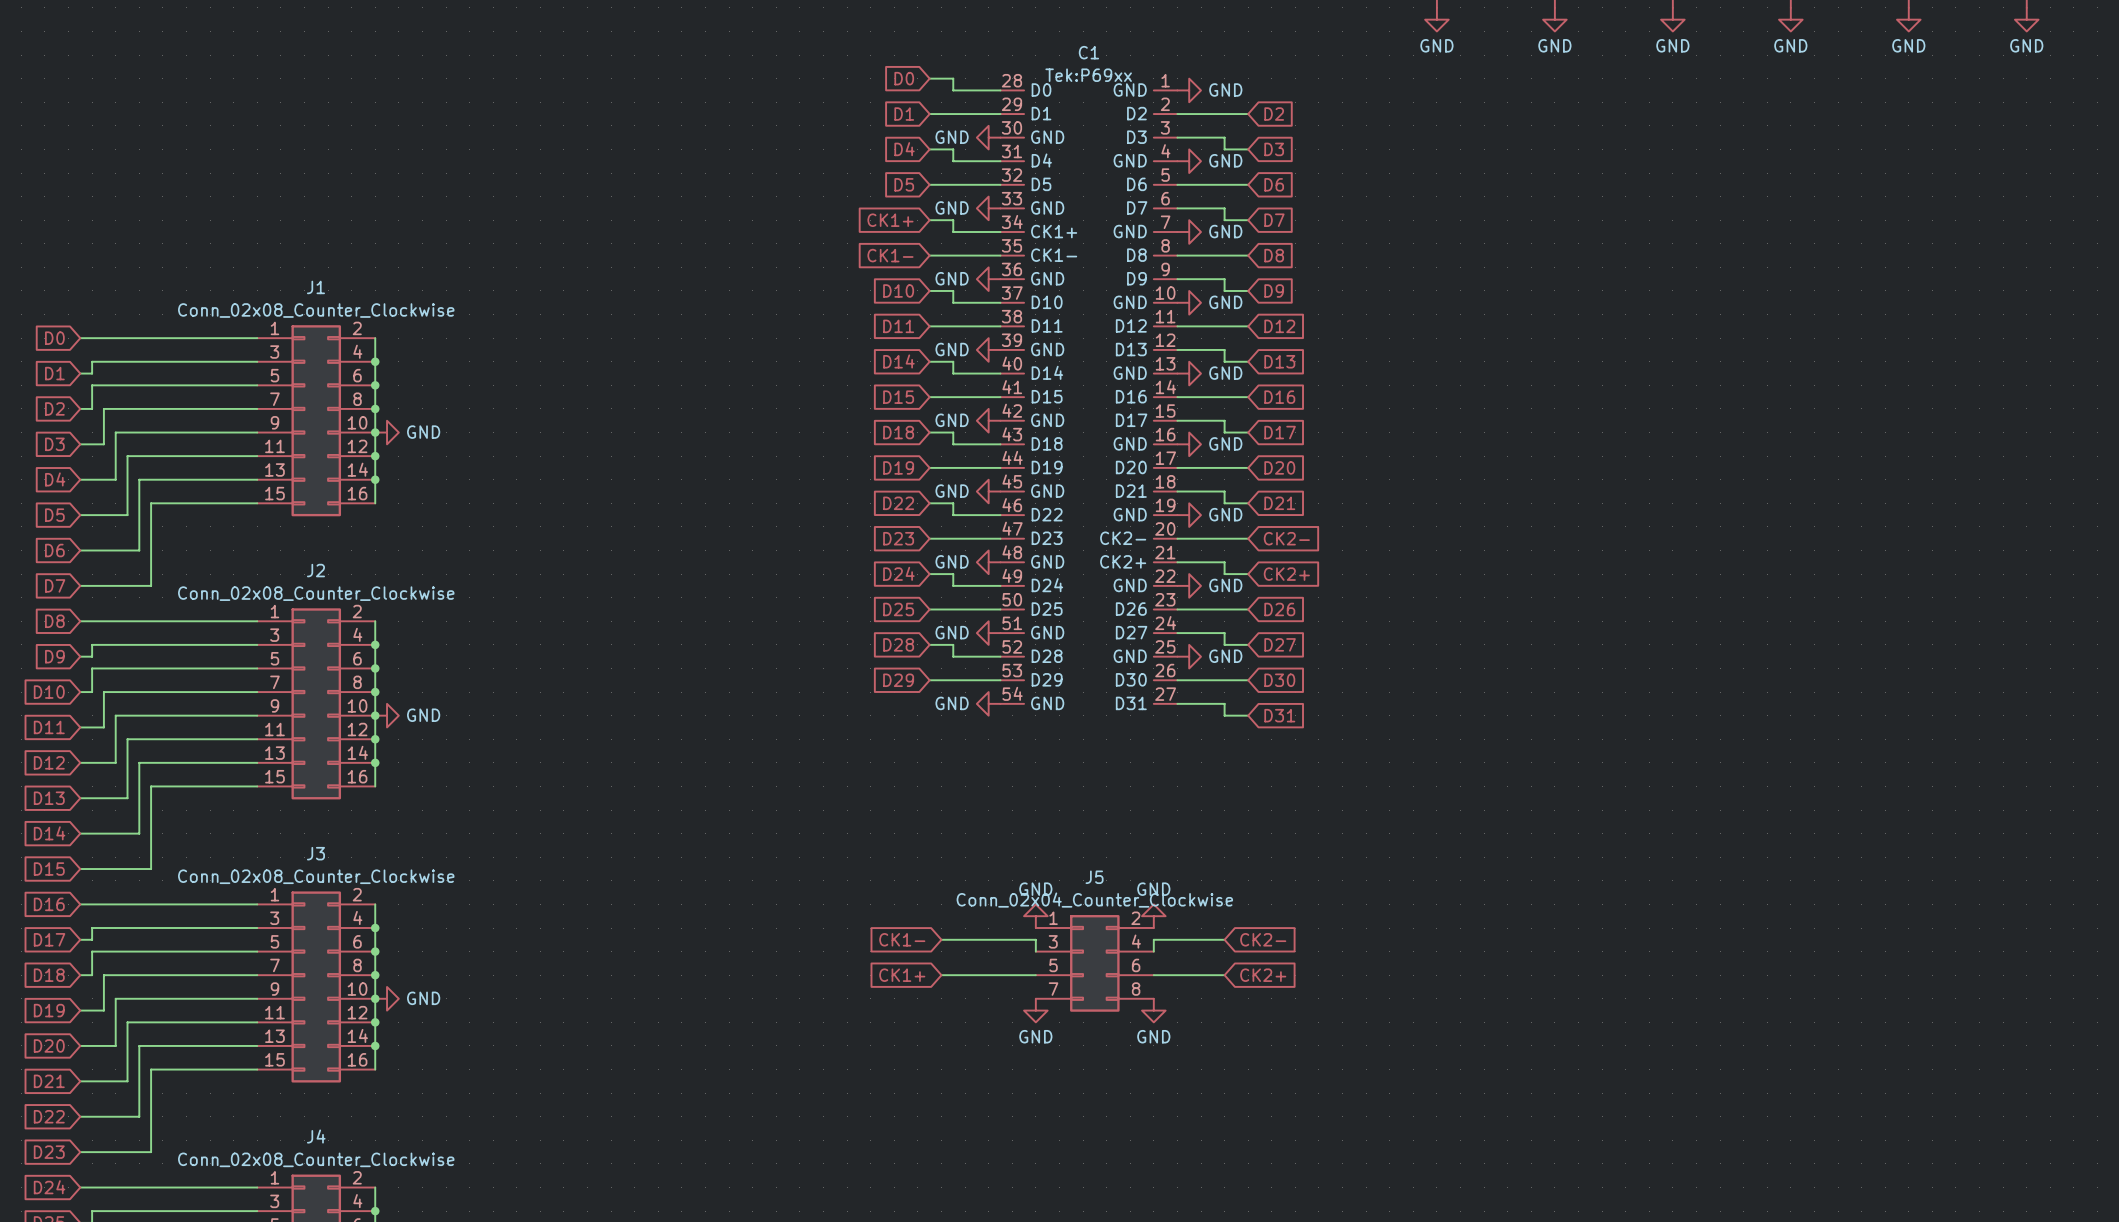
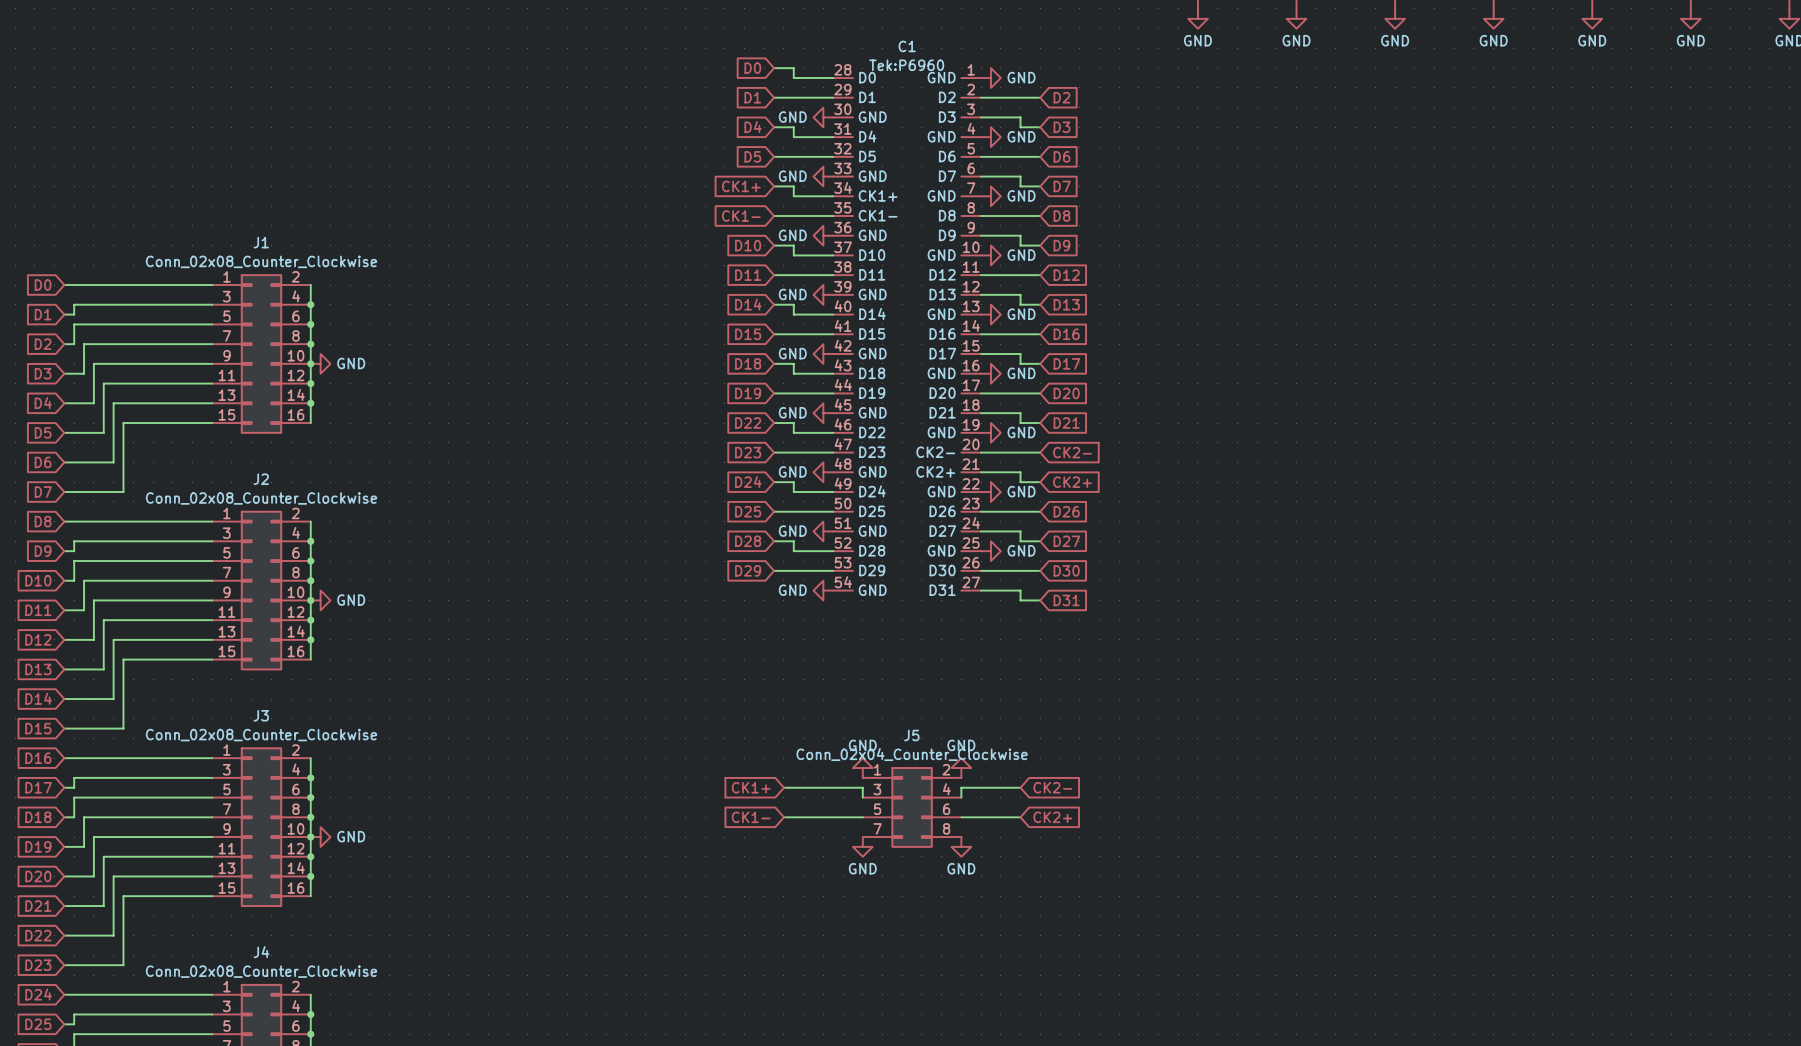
C1 text: Tek:P69xx (1088, 75) -> Tek:P6960 (906, 65)
global label: CK1- (902, 939) -> CK1+ (751, 787)
global label: CK1+ (902, 975) -> CK1- (751, 817)

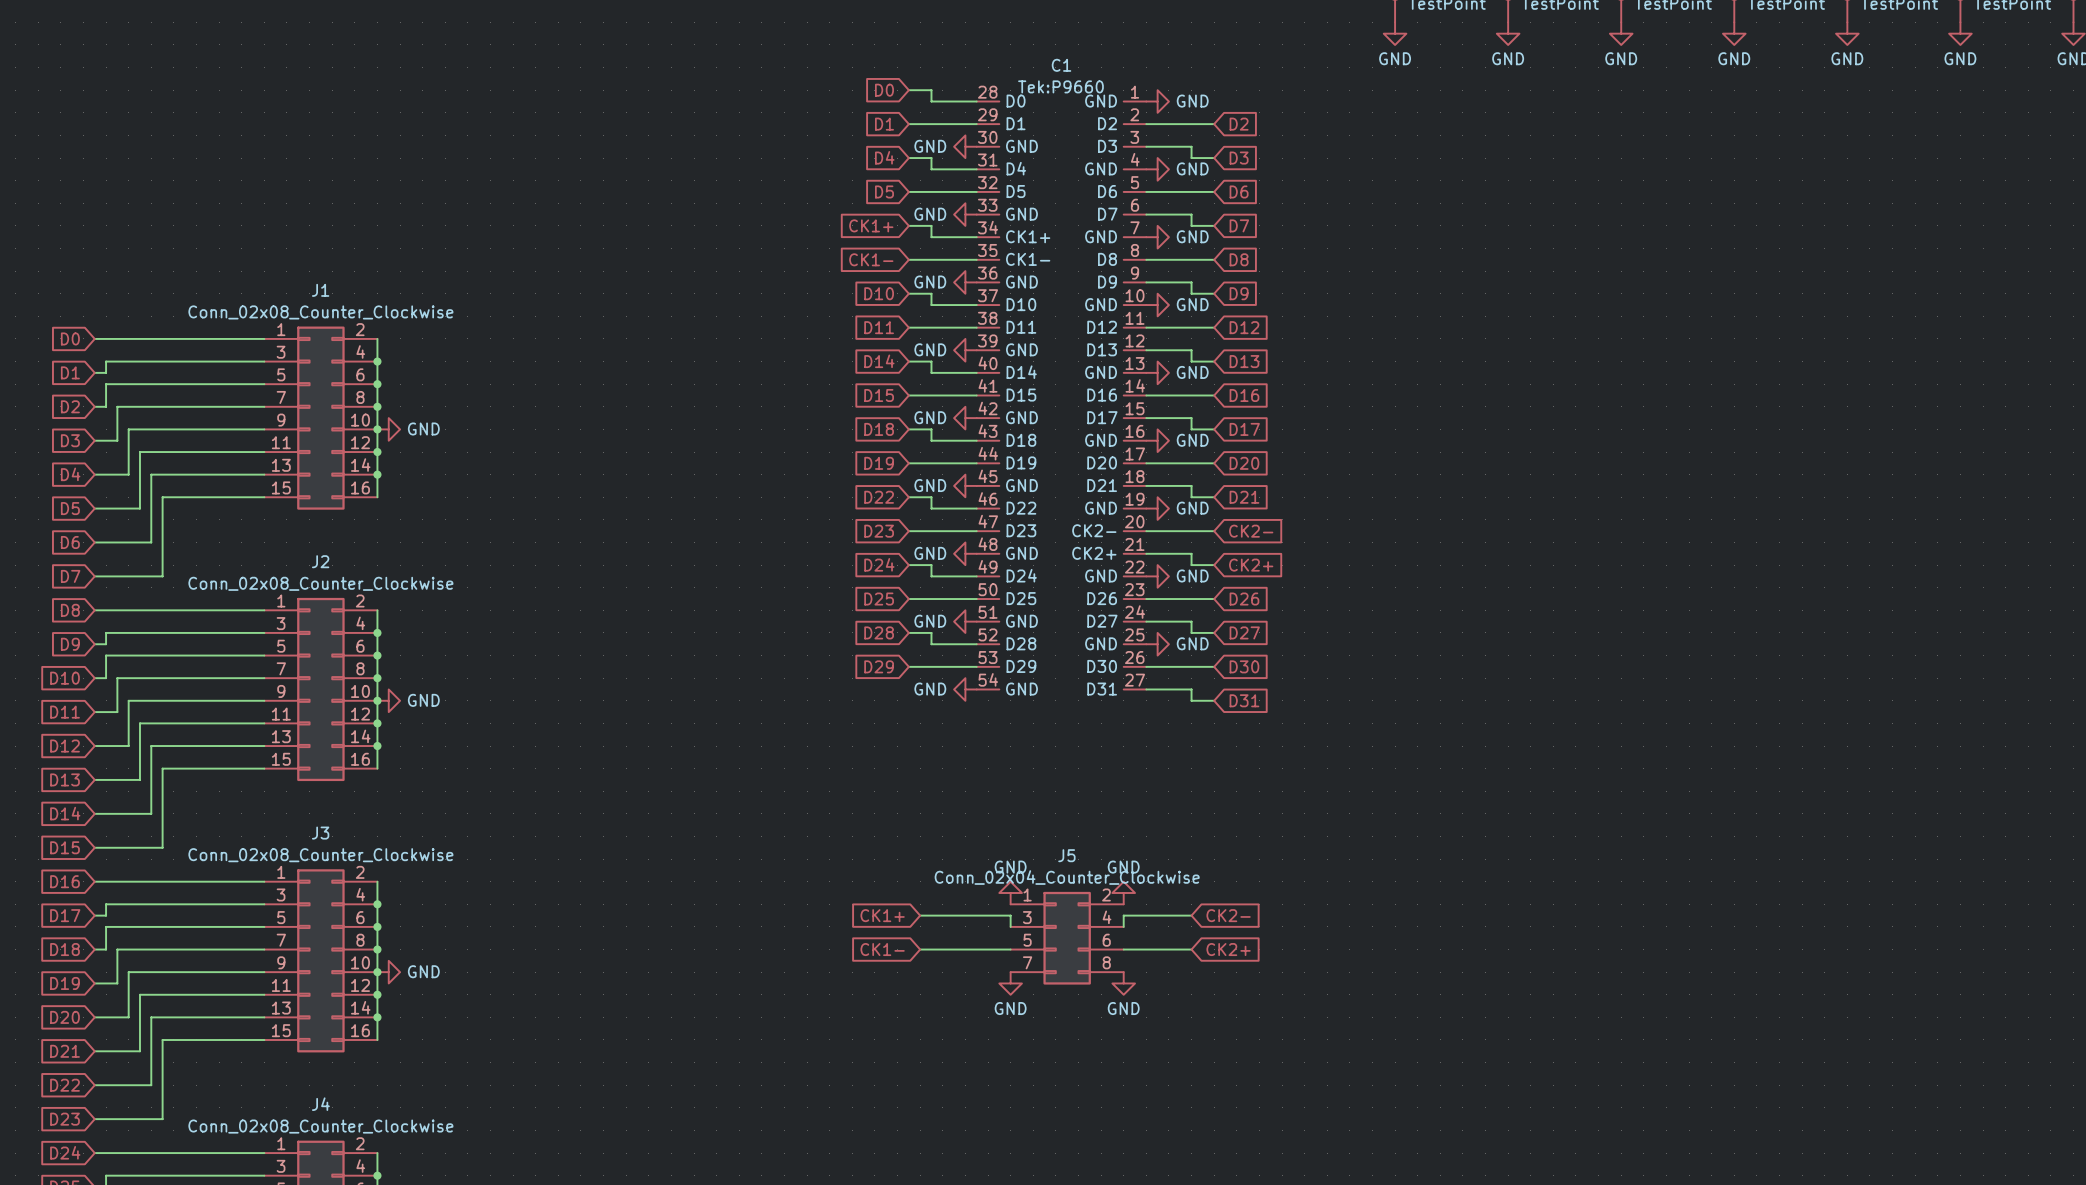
C1 text: Tek:P6960 (906, 65) -> Tek:P9660 (1060, 86)

